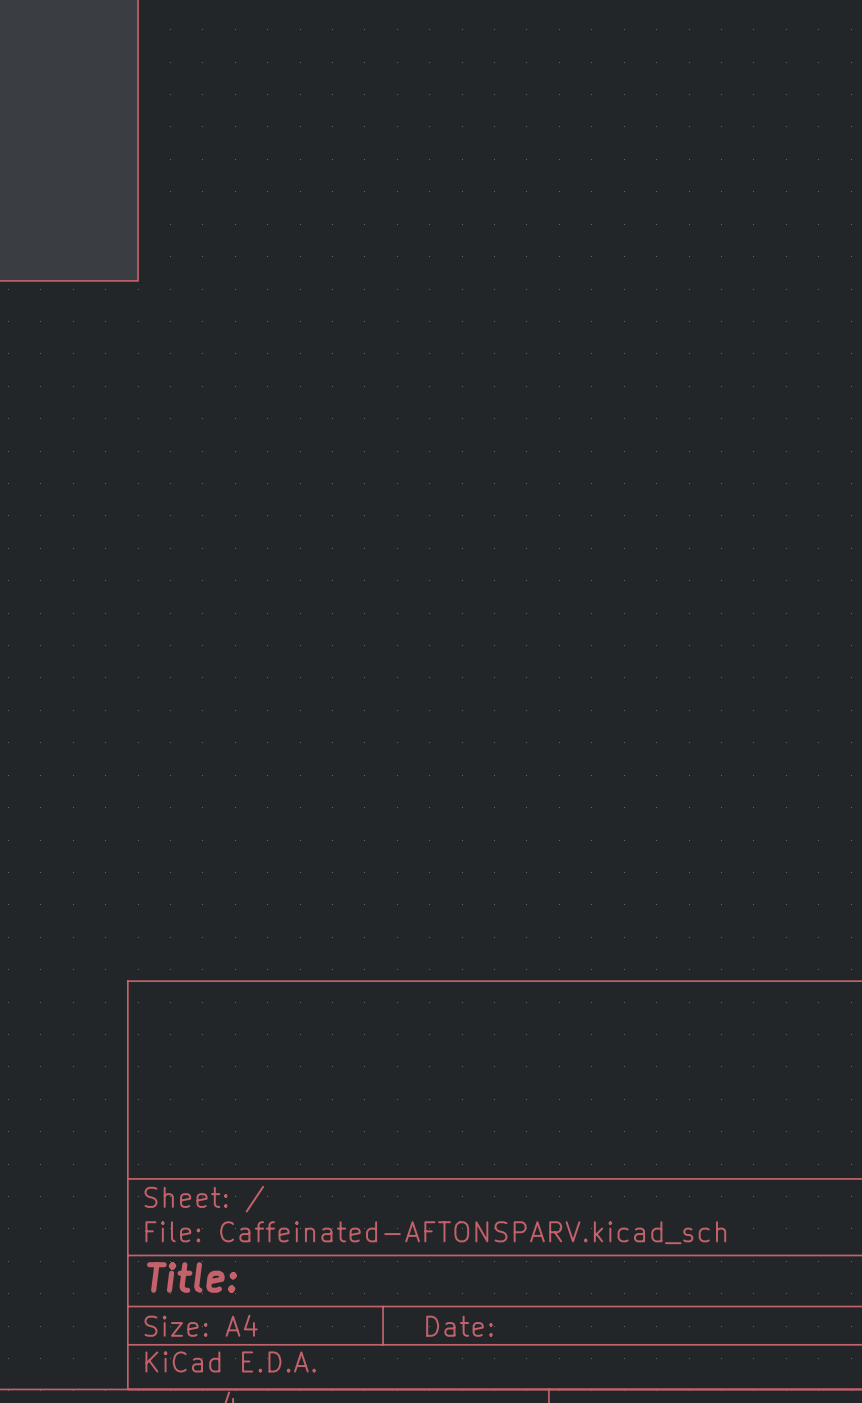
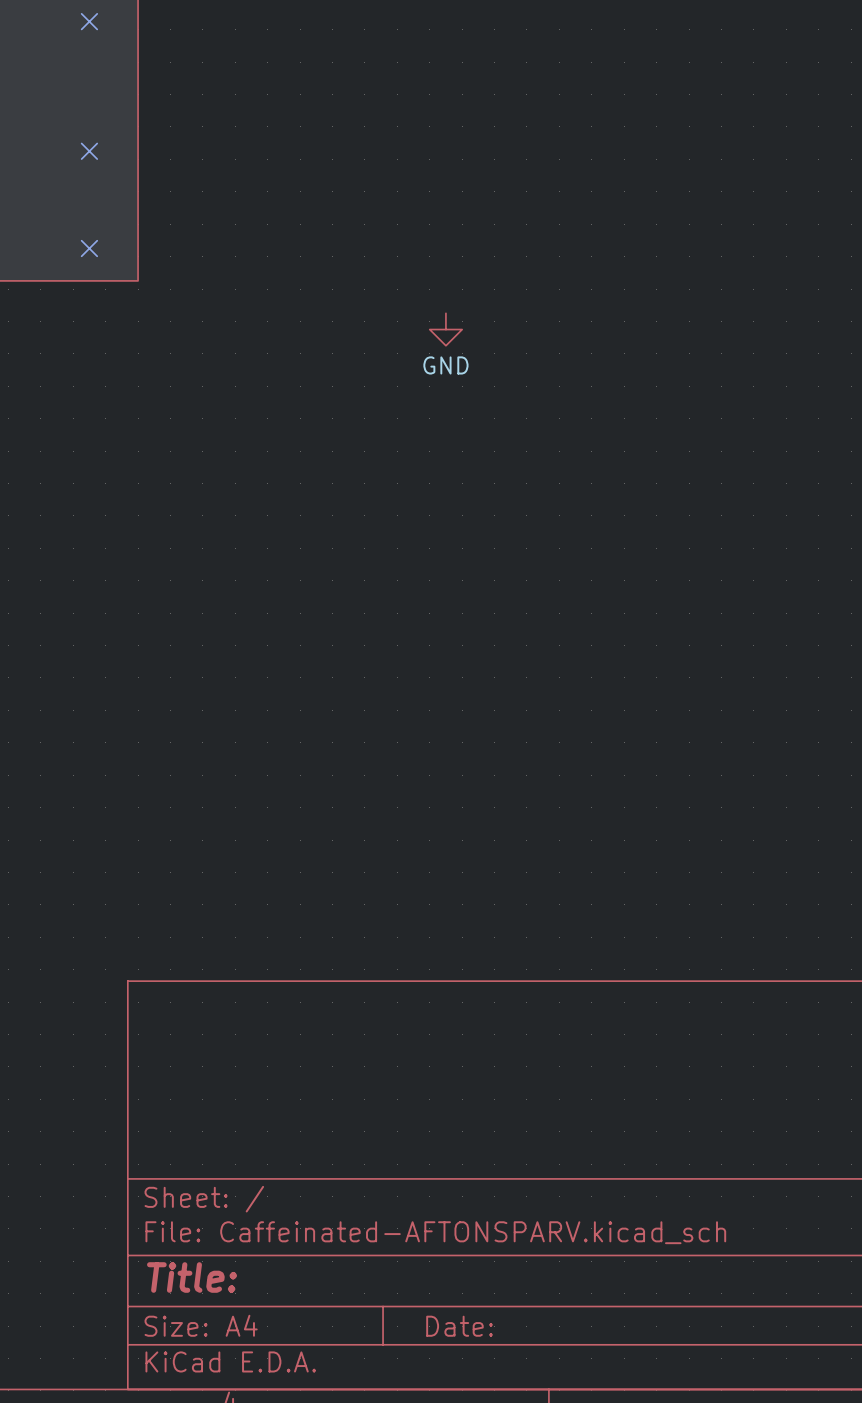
no-connect mark: none -> (89, 21)
no-connect mark: none -> (89, 151)
no-connect mark: none -> (89, 248)
power symbol: none -> GND (445, 329)

